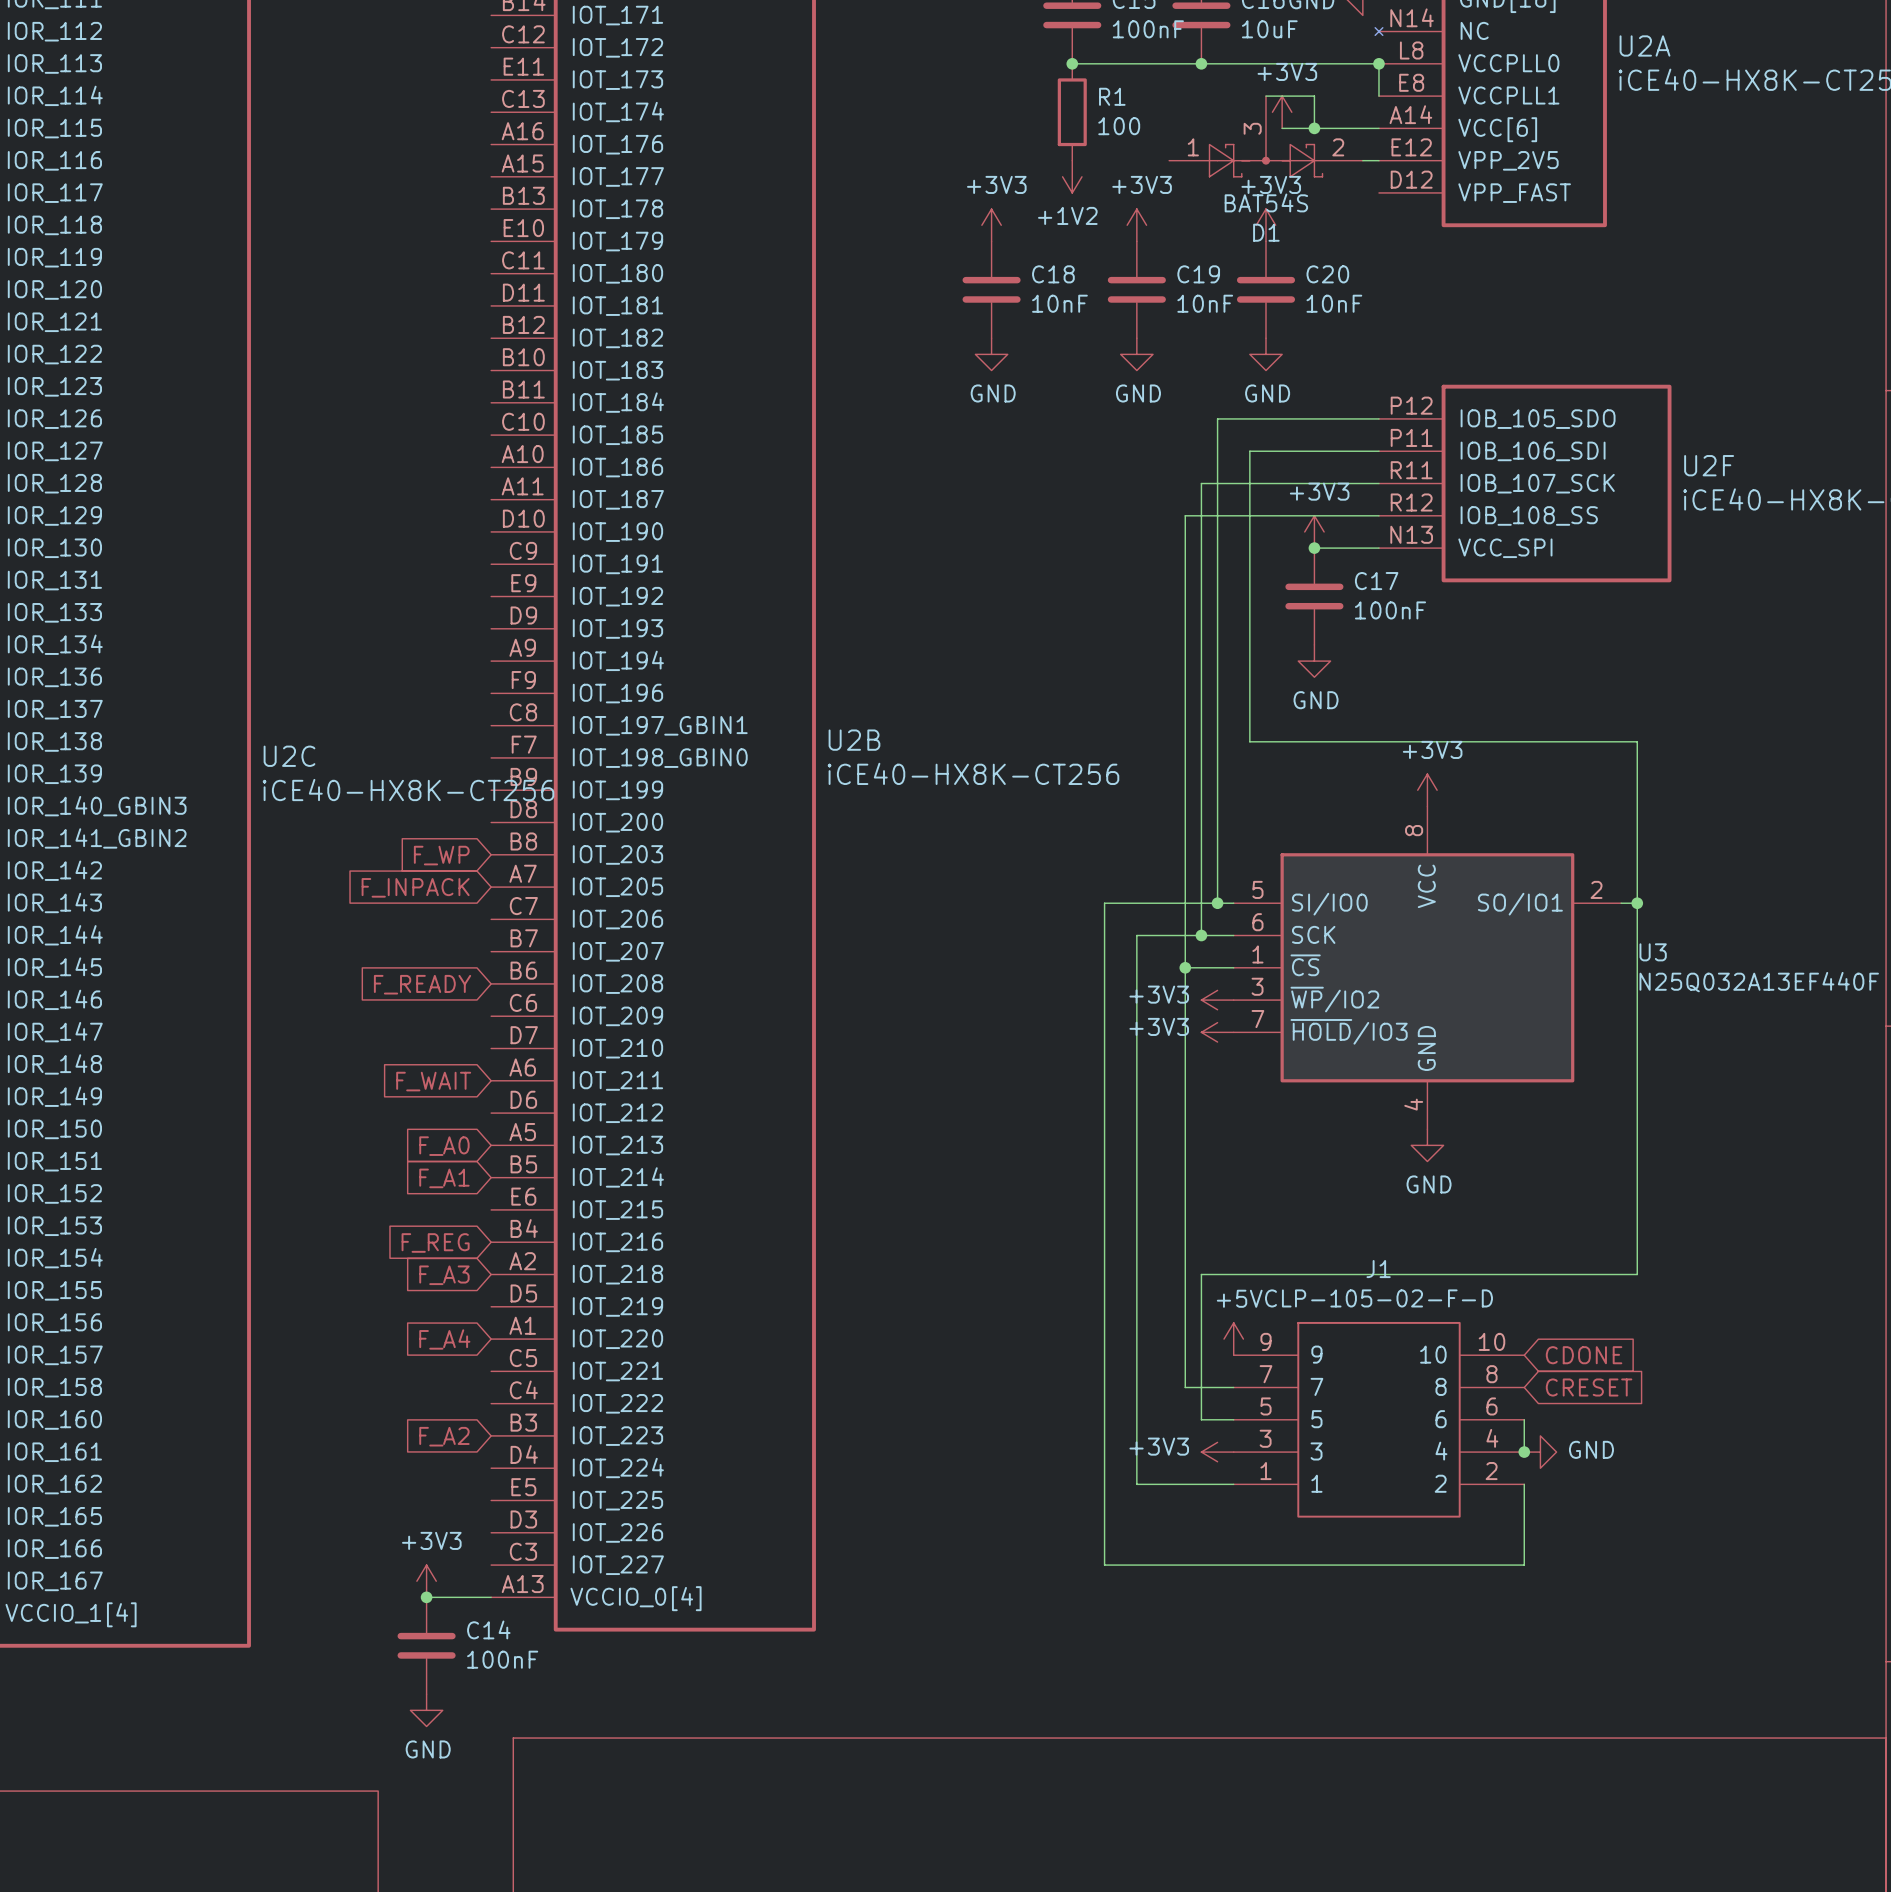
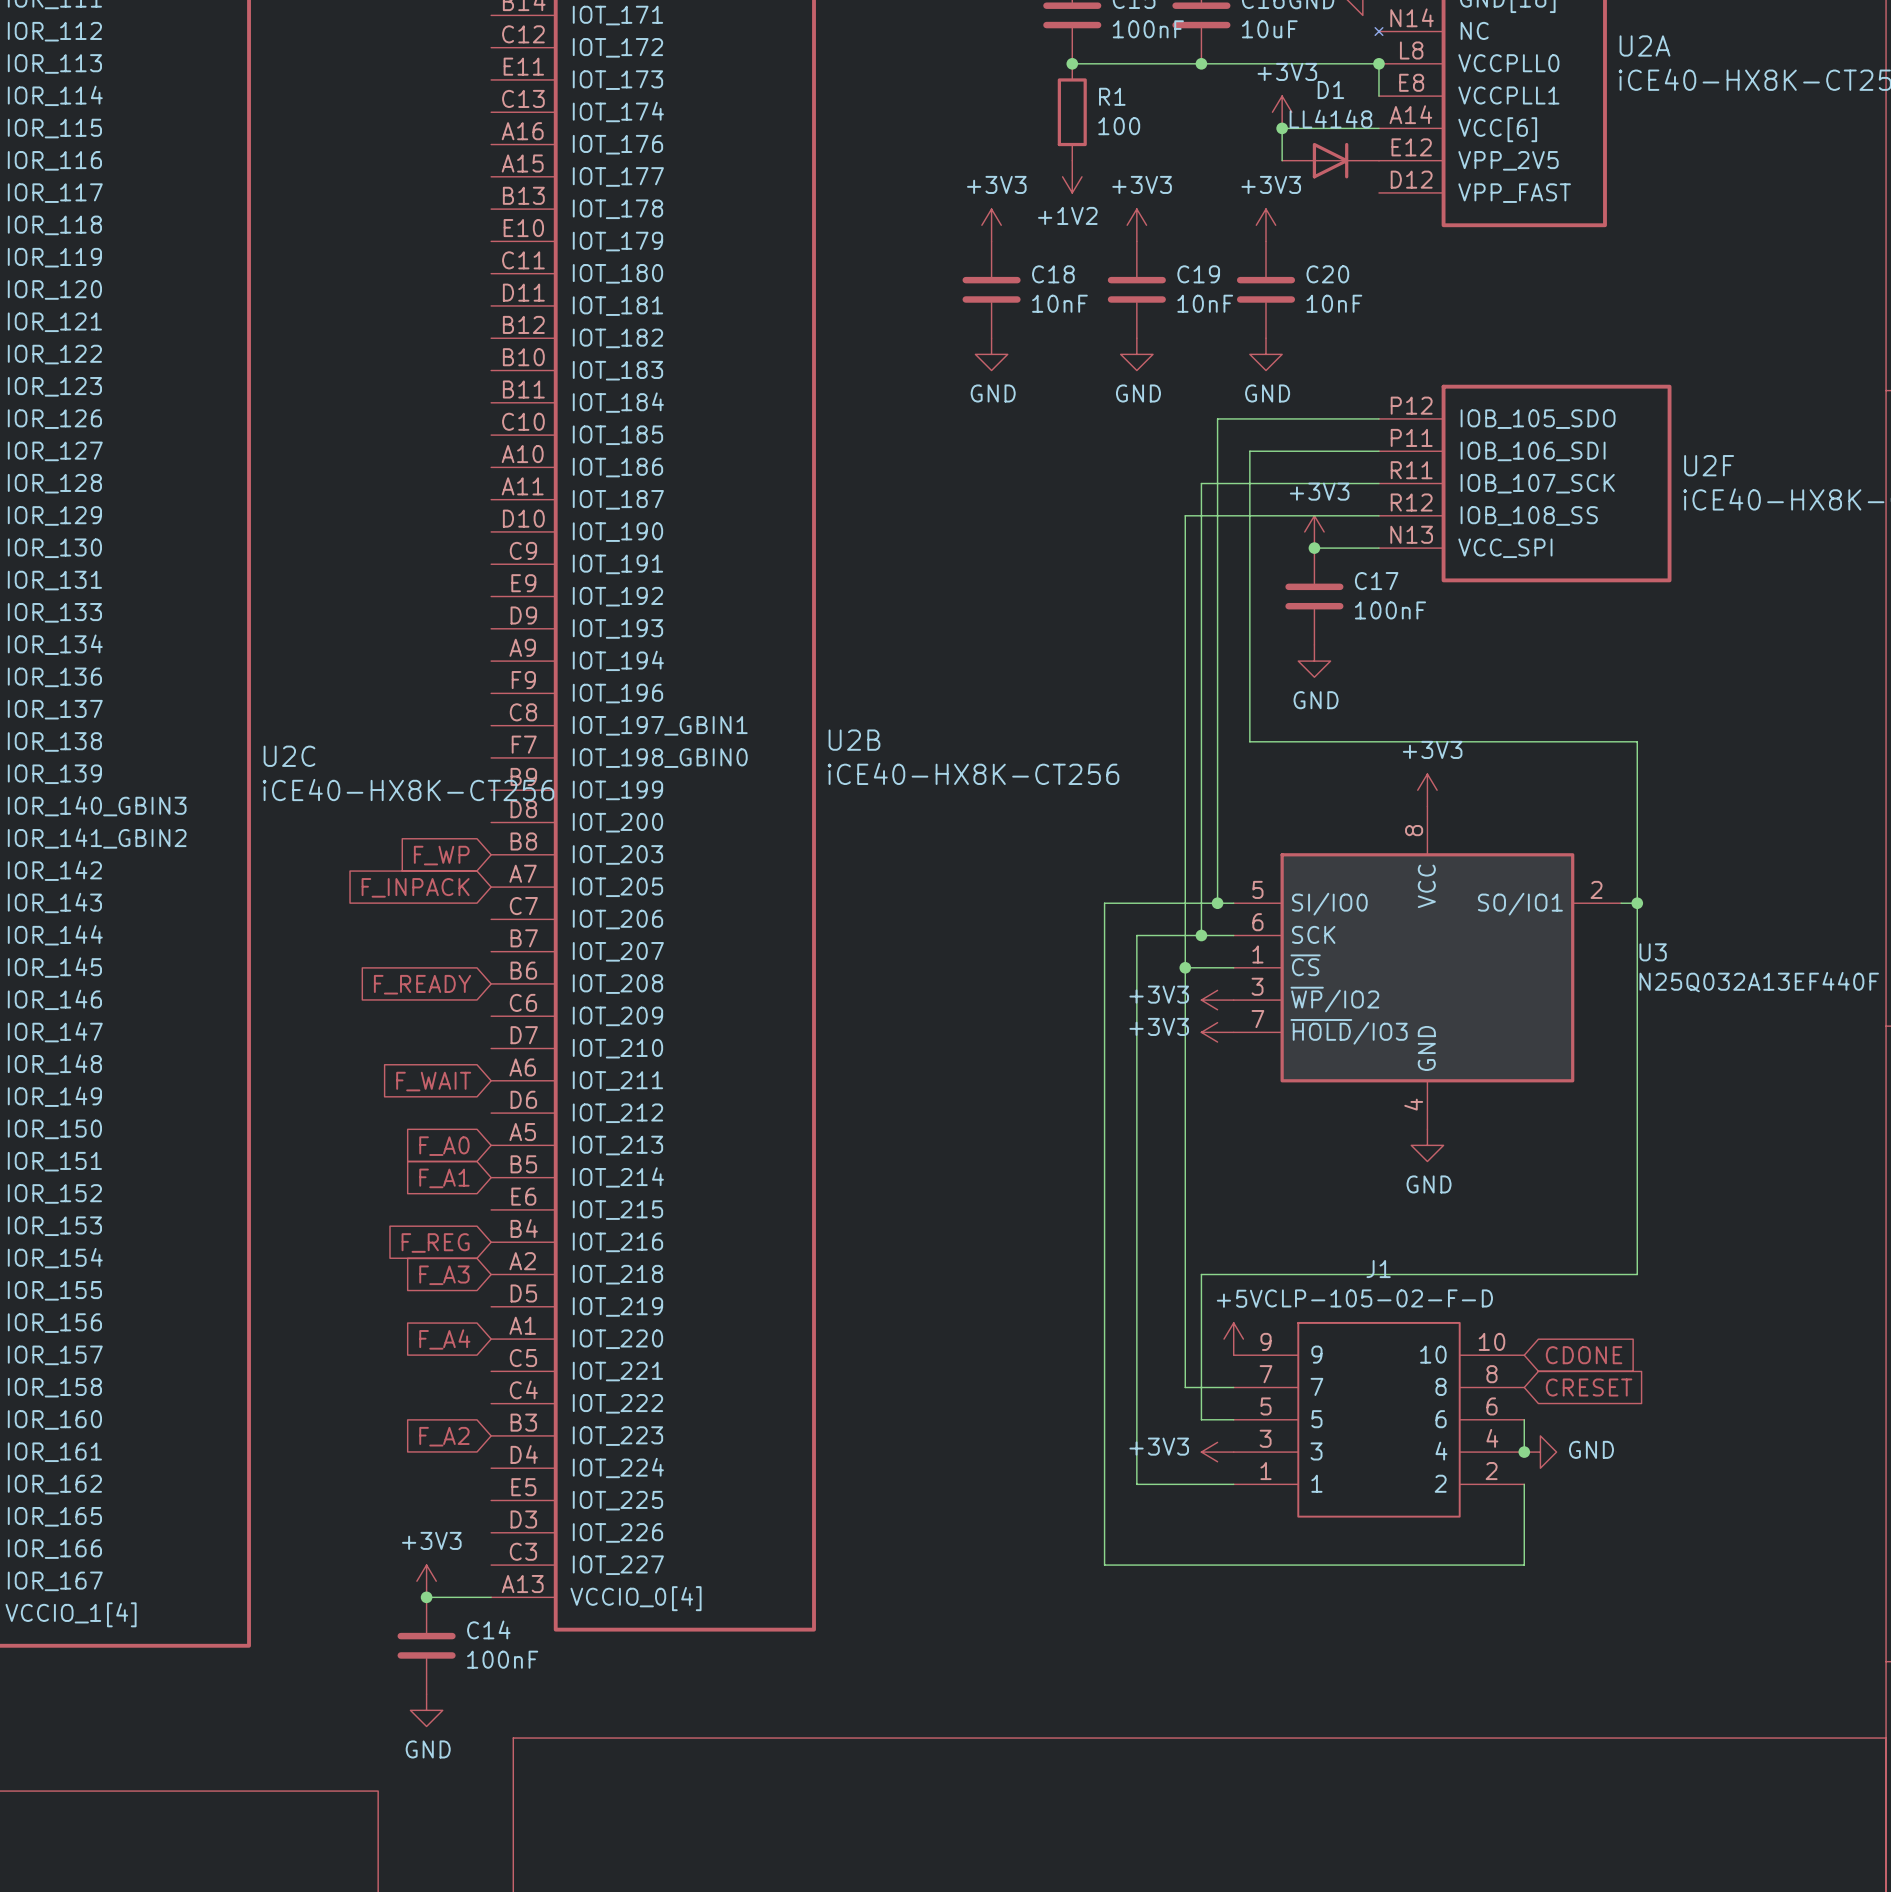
D1 symbol: [1169, 96, 1363, 177] -> [1282, 142, 1379, 179]
wire: (1265, 96) (1314, 96) (1314, 128) -> none
wire: none -> (1282, 128) (1282, 160)
junction position: (1314, 128) -> (1282, 128)
D1 value: BAT54S (1266, 202) -> LL4148 (1330, 119)
D1 name position: D1 (1266, 232) -> D1 (1330, 90)

